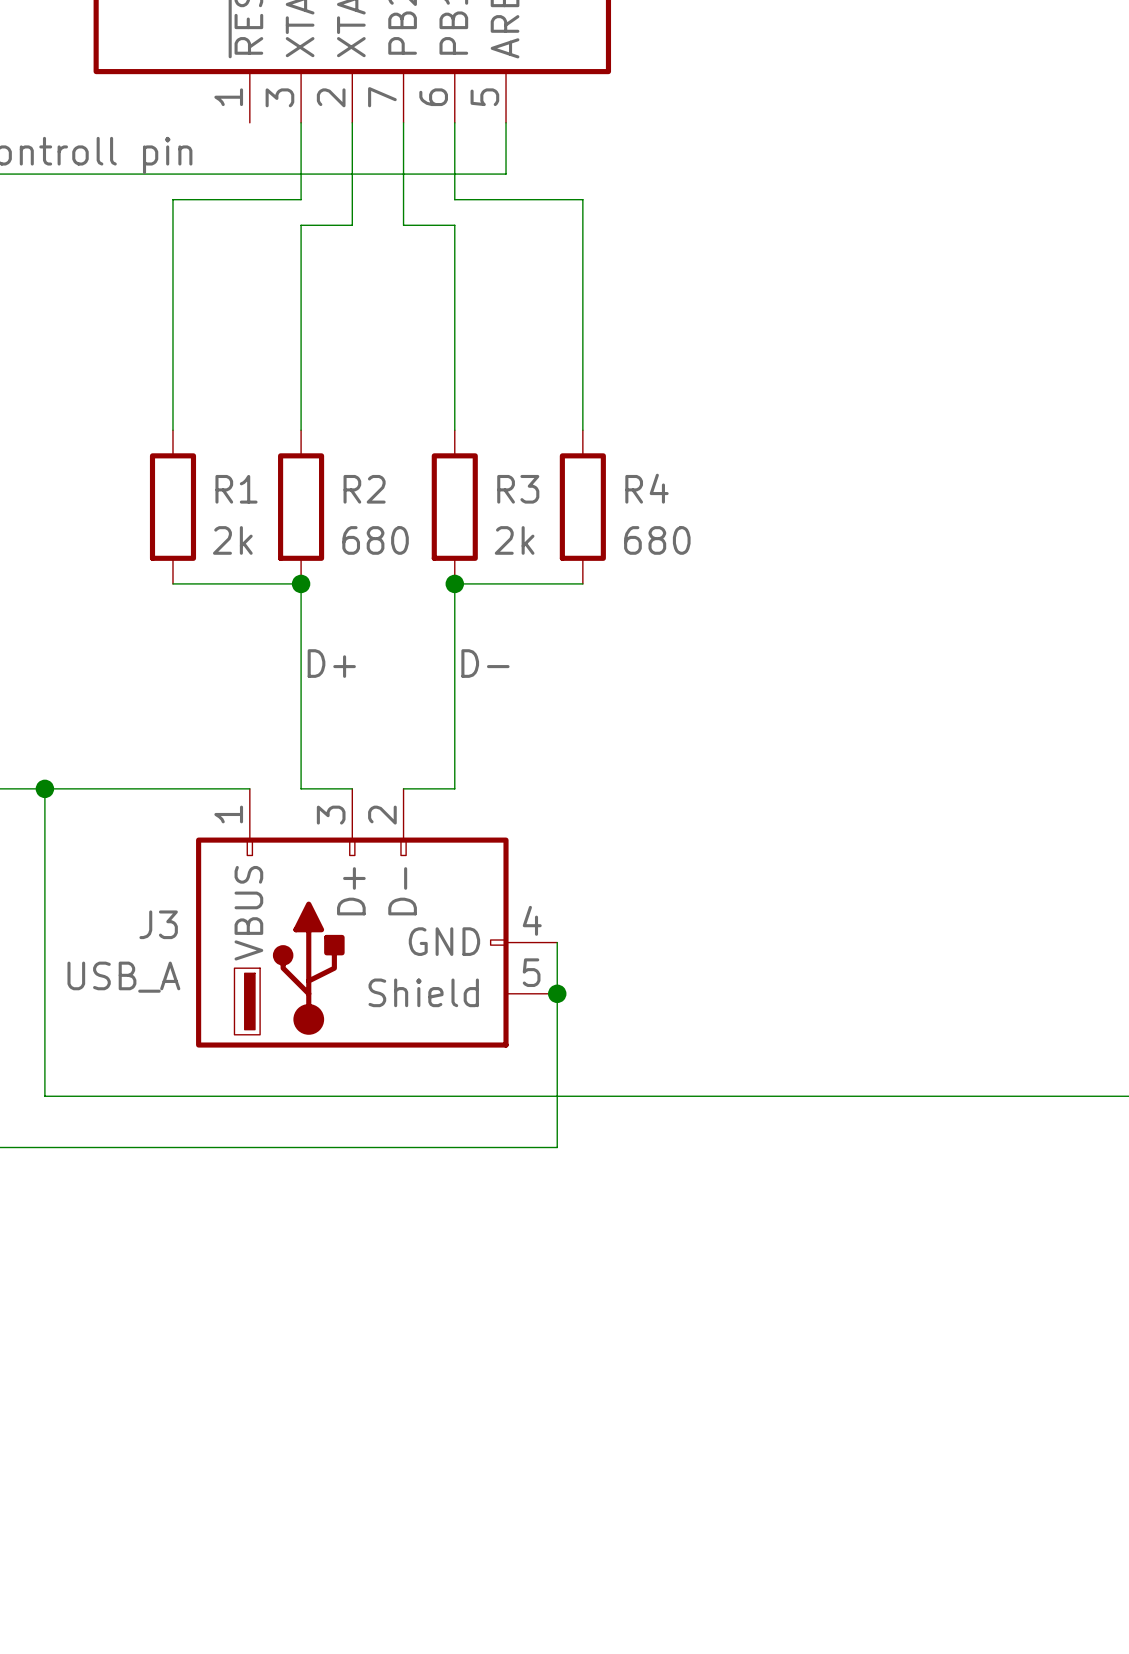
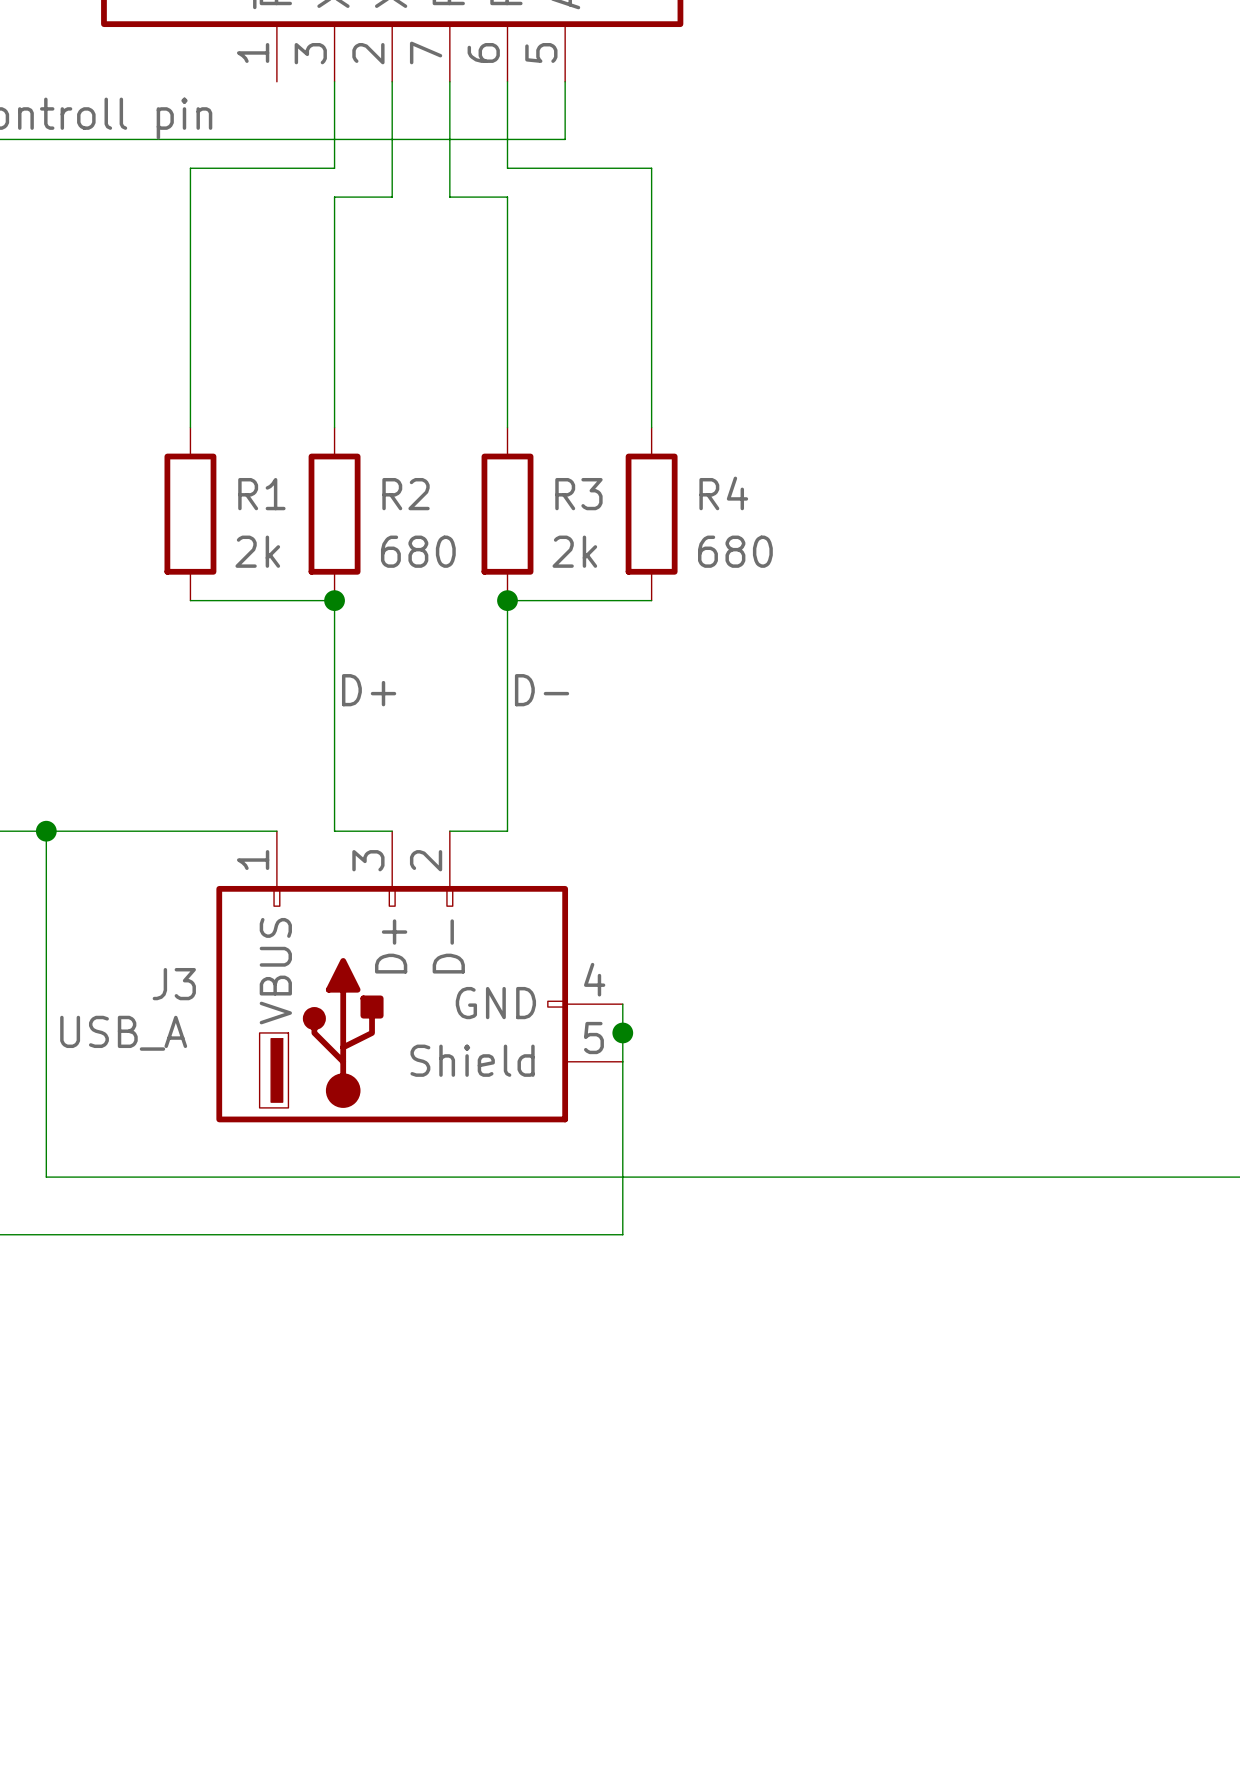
J3 value position: USB_A (123, 977) -> USB_A (123, 1033)
junction position: (557, 993) -> (622, 1032)

